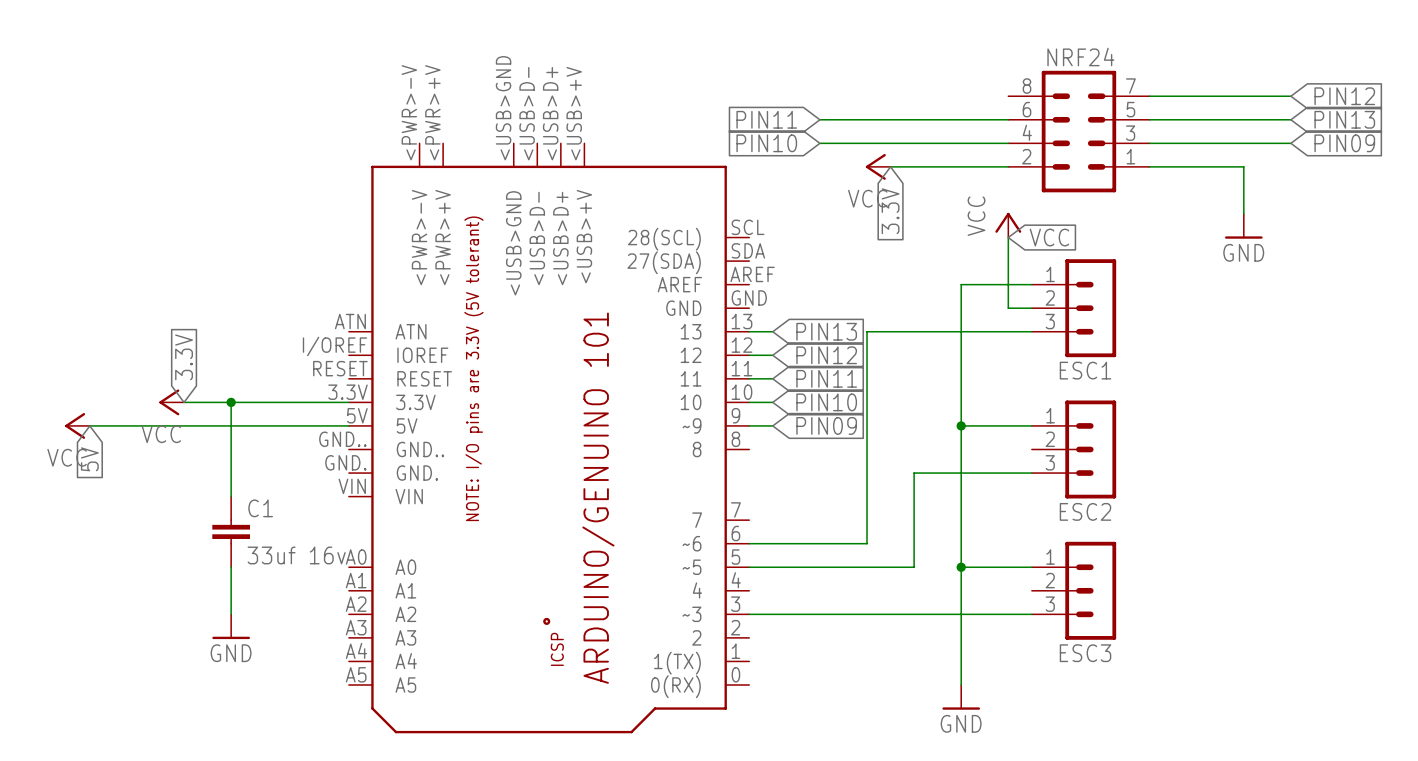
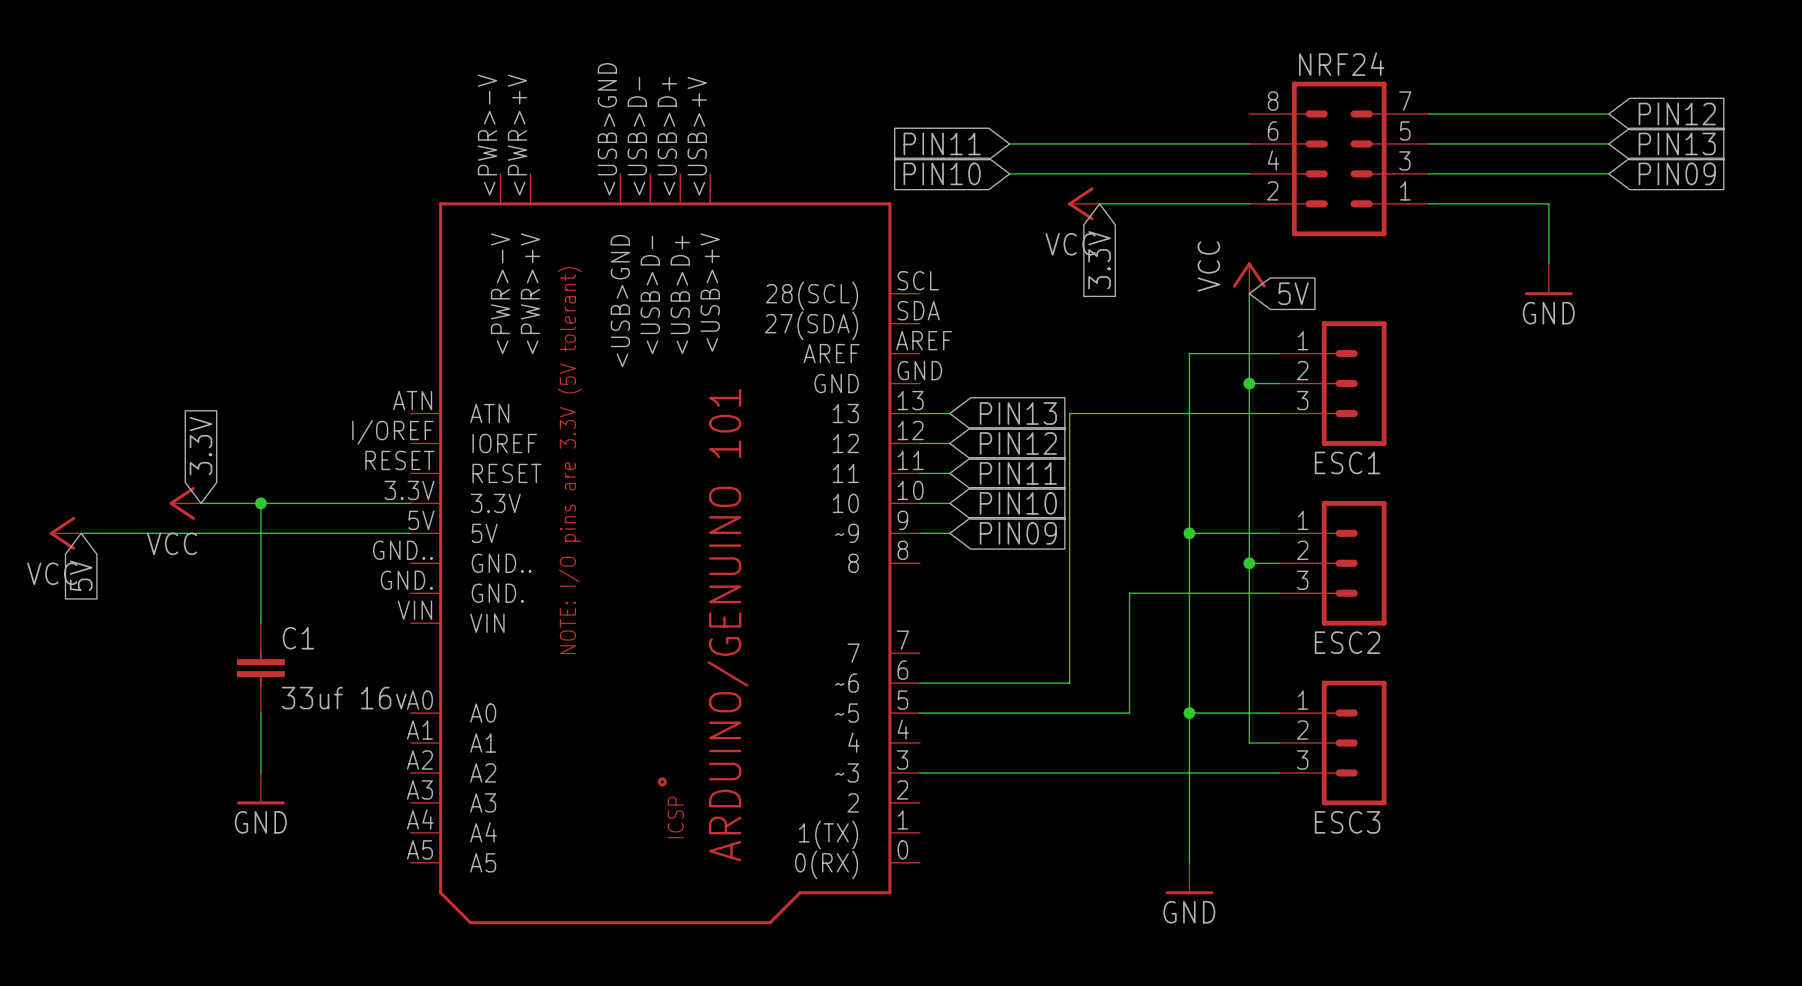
global label: VCC (1049, 237) -> 5V (1293, 293)
wire: none -> (1249, 383) (1249, 743) (1279, 743)
junction: none -> (1249, 383)
wire: none -> (1249, 563) (1279, 563)
junction: none -> (1249, 563)

